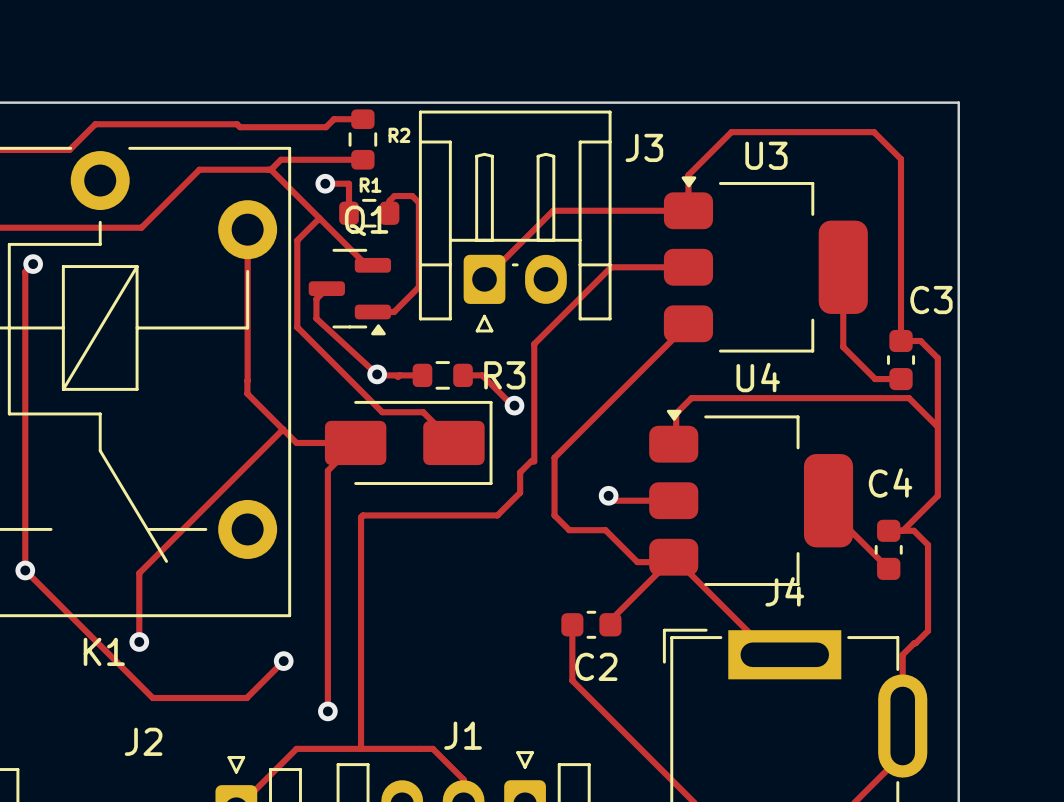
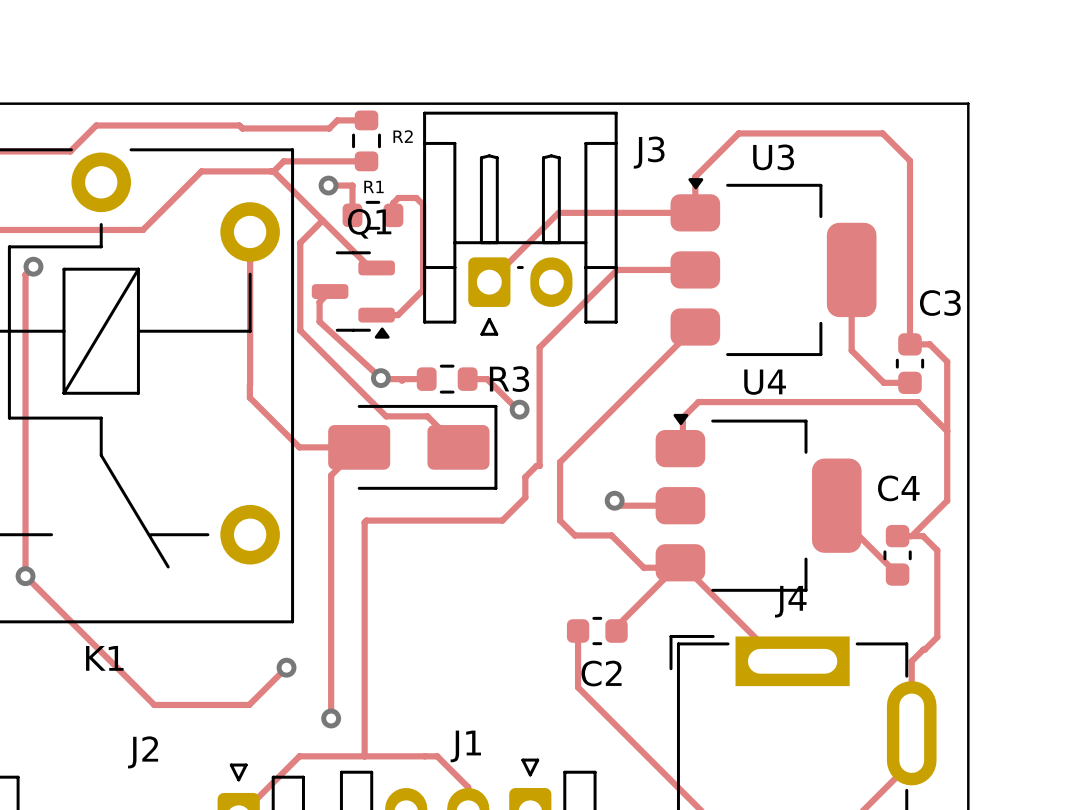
track: (283, 429) (139, 573) (139, 641) -> none
via: (139, 641) -> none

